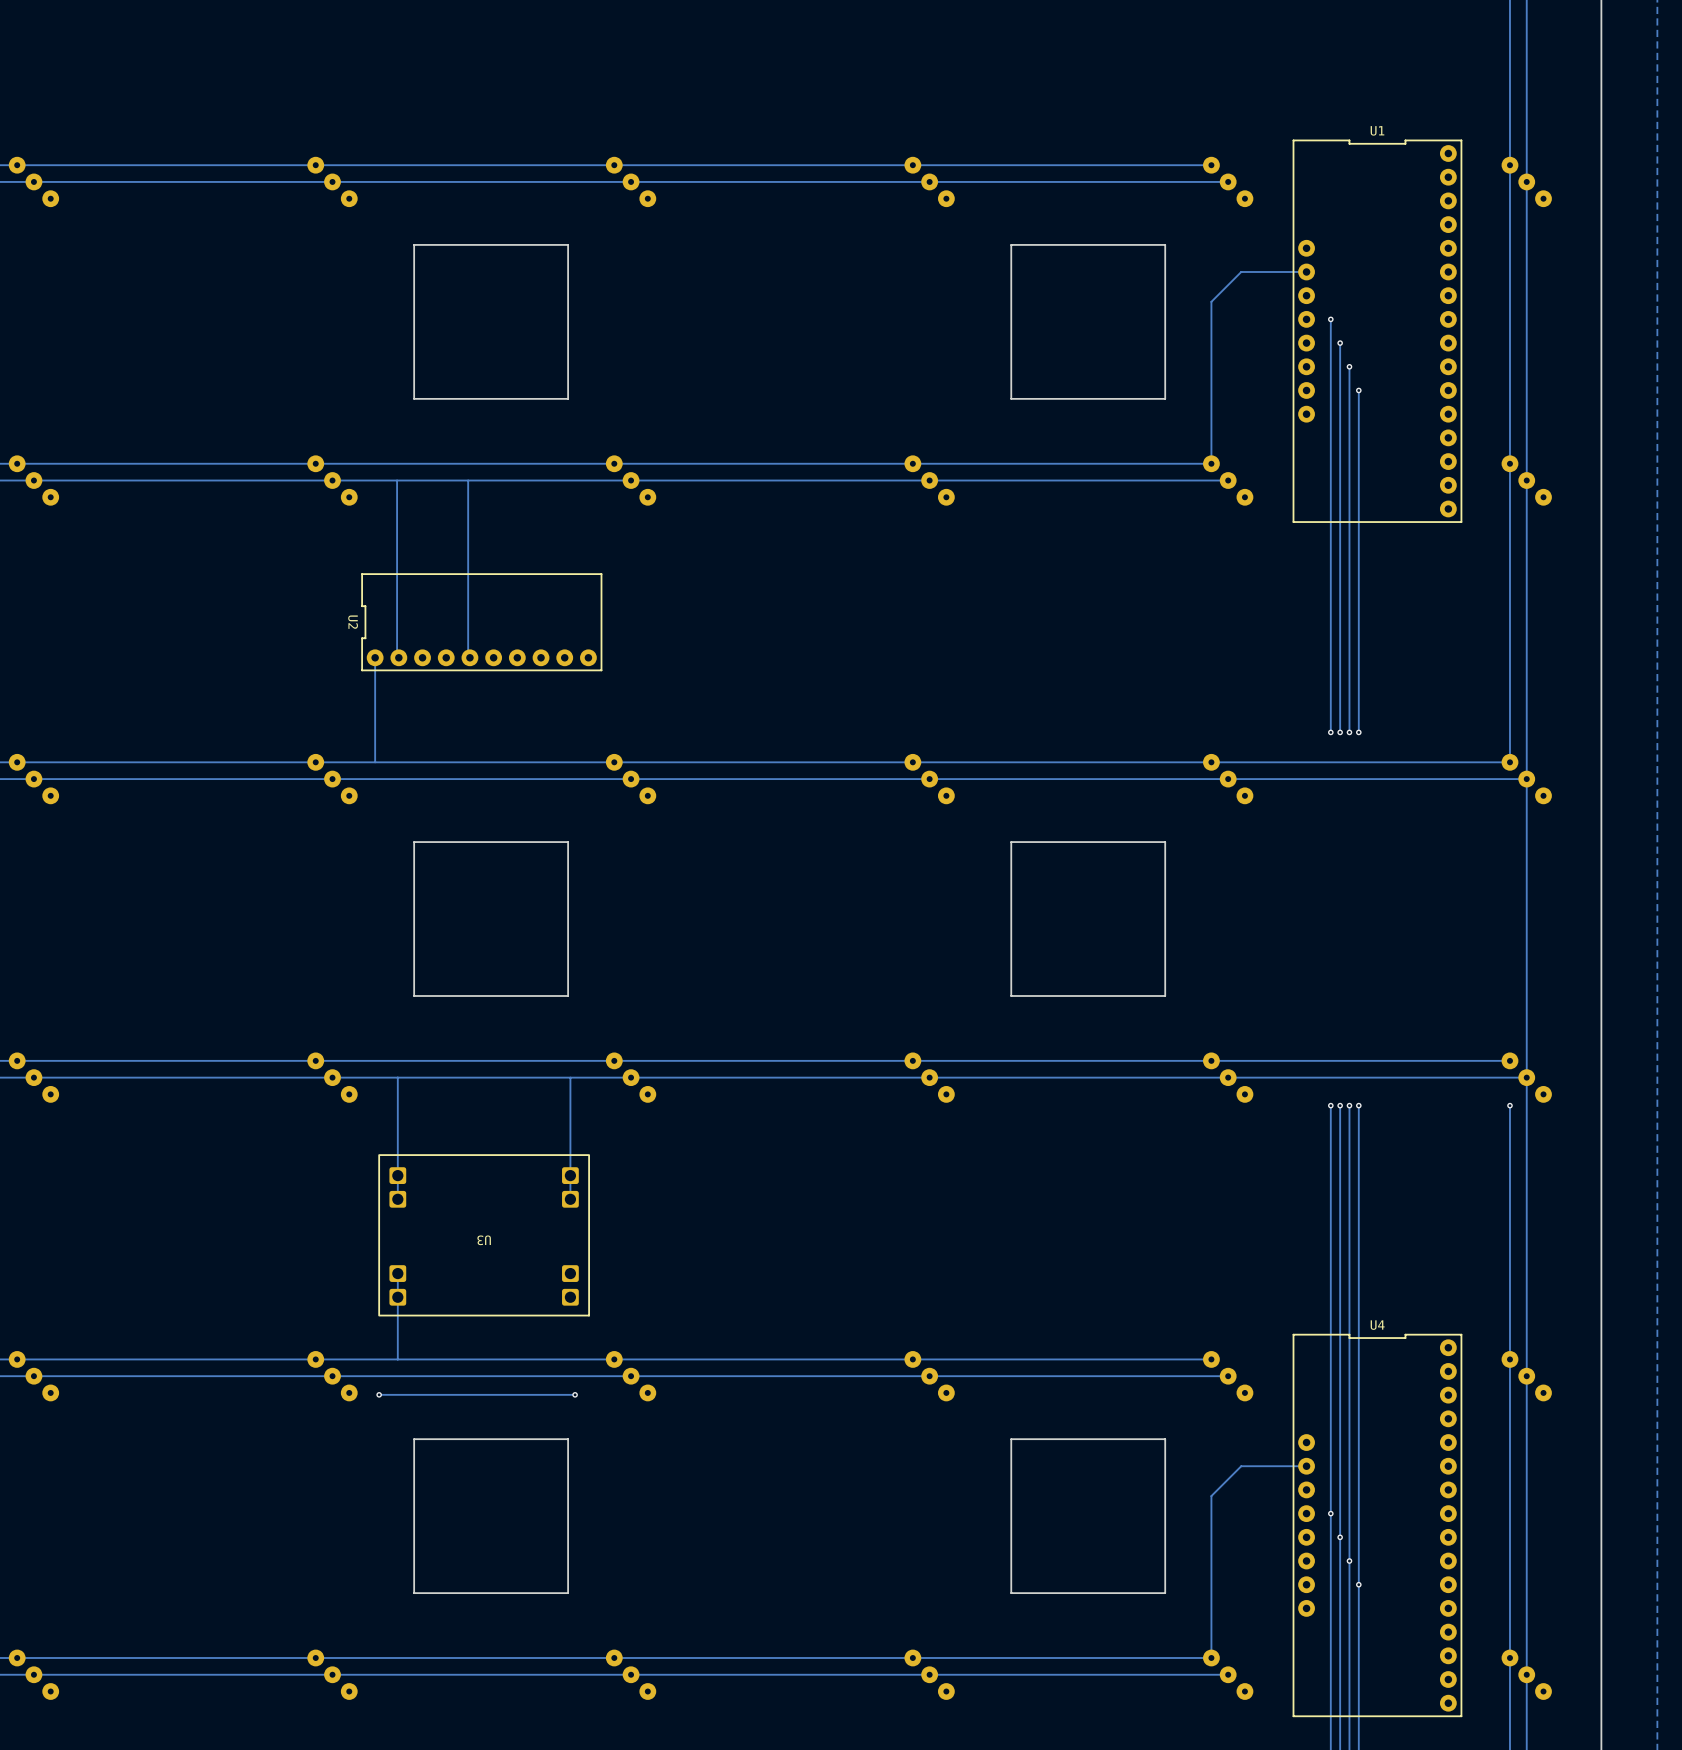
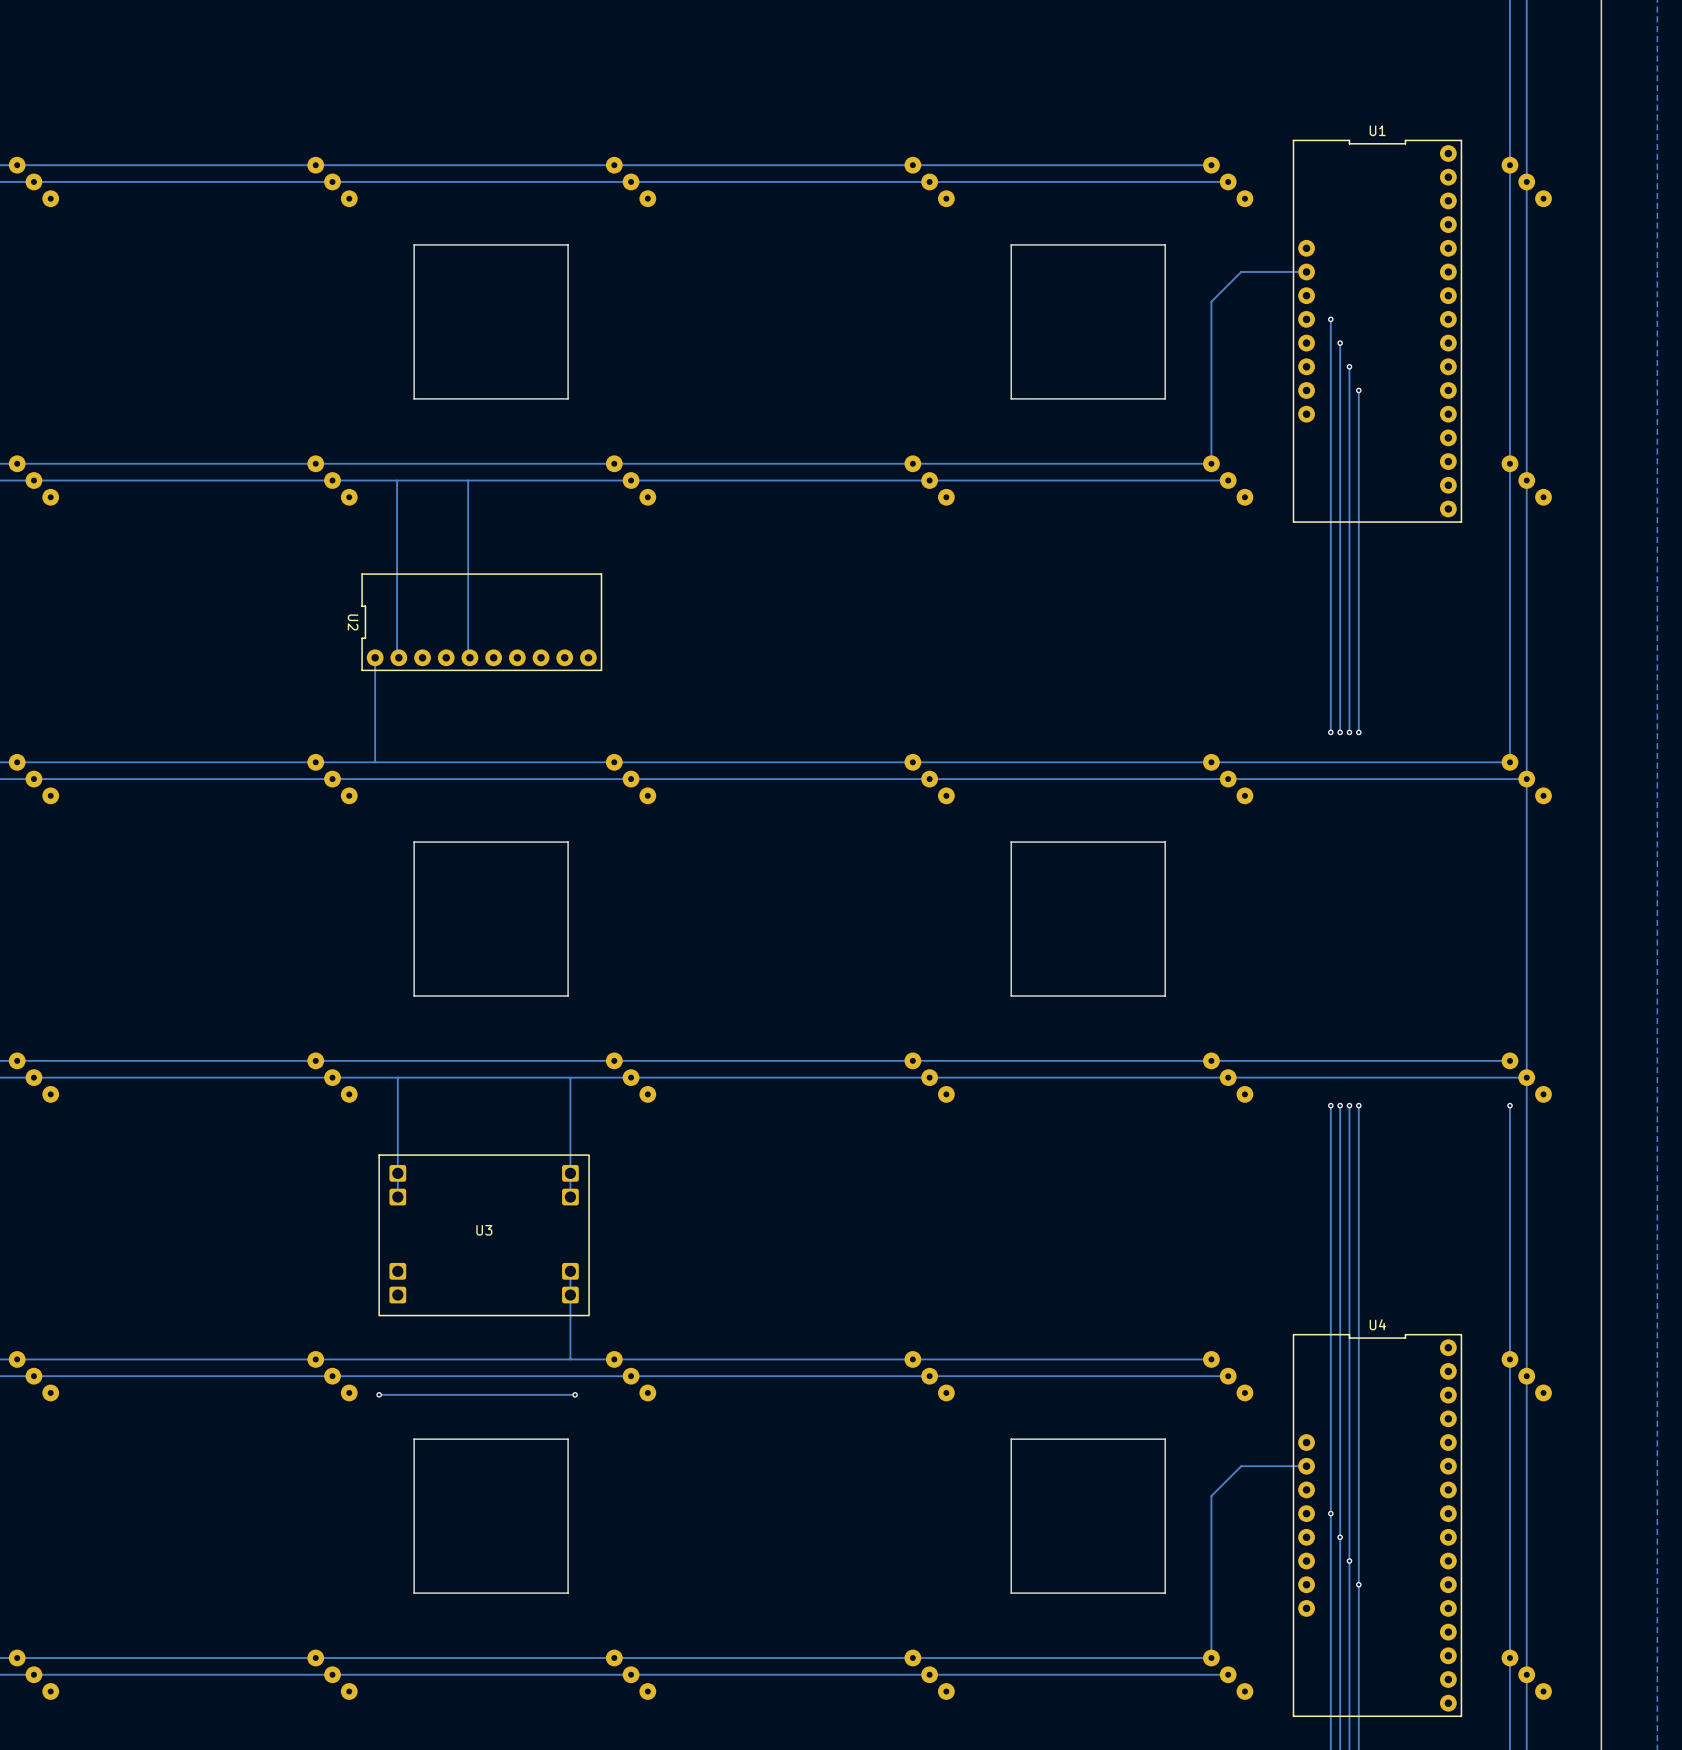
U3 rotation: 0° (484, 1235) -> 180° (484, 1235)
track: none -> (570, 1271) (570, 1359)
track: (397, 1273) (397, 1359) -> none

